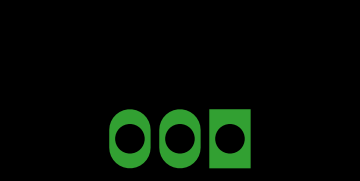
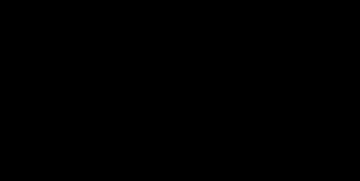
part: (179, 138) -> none

